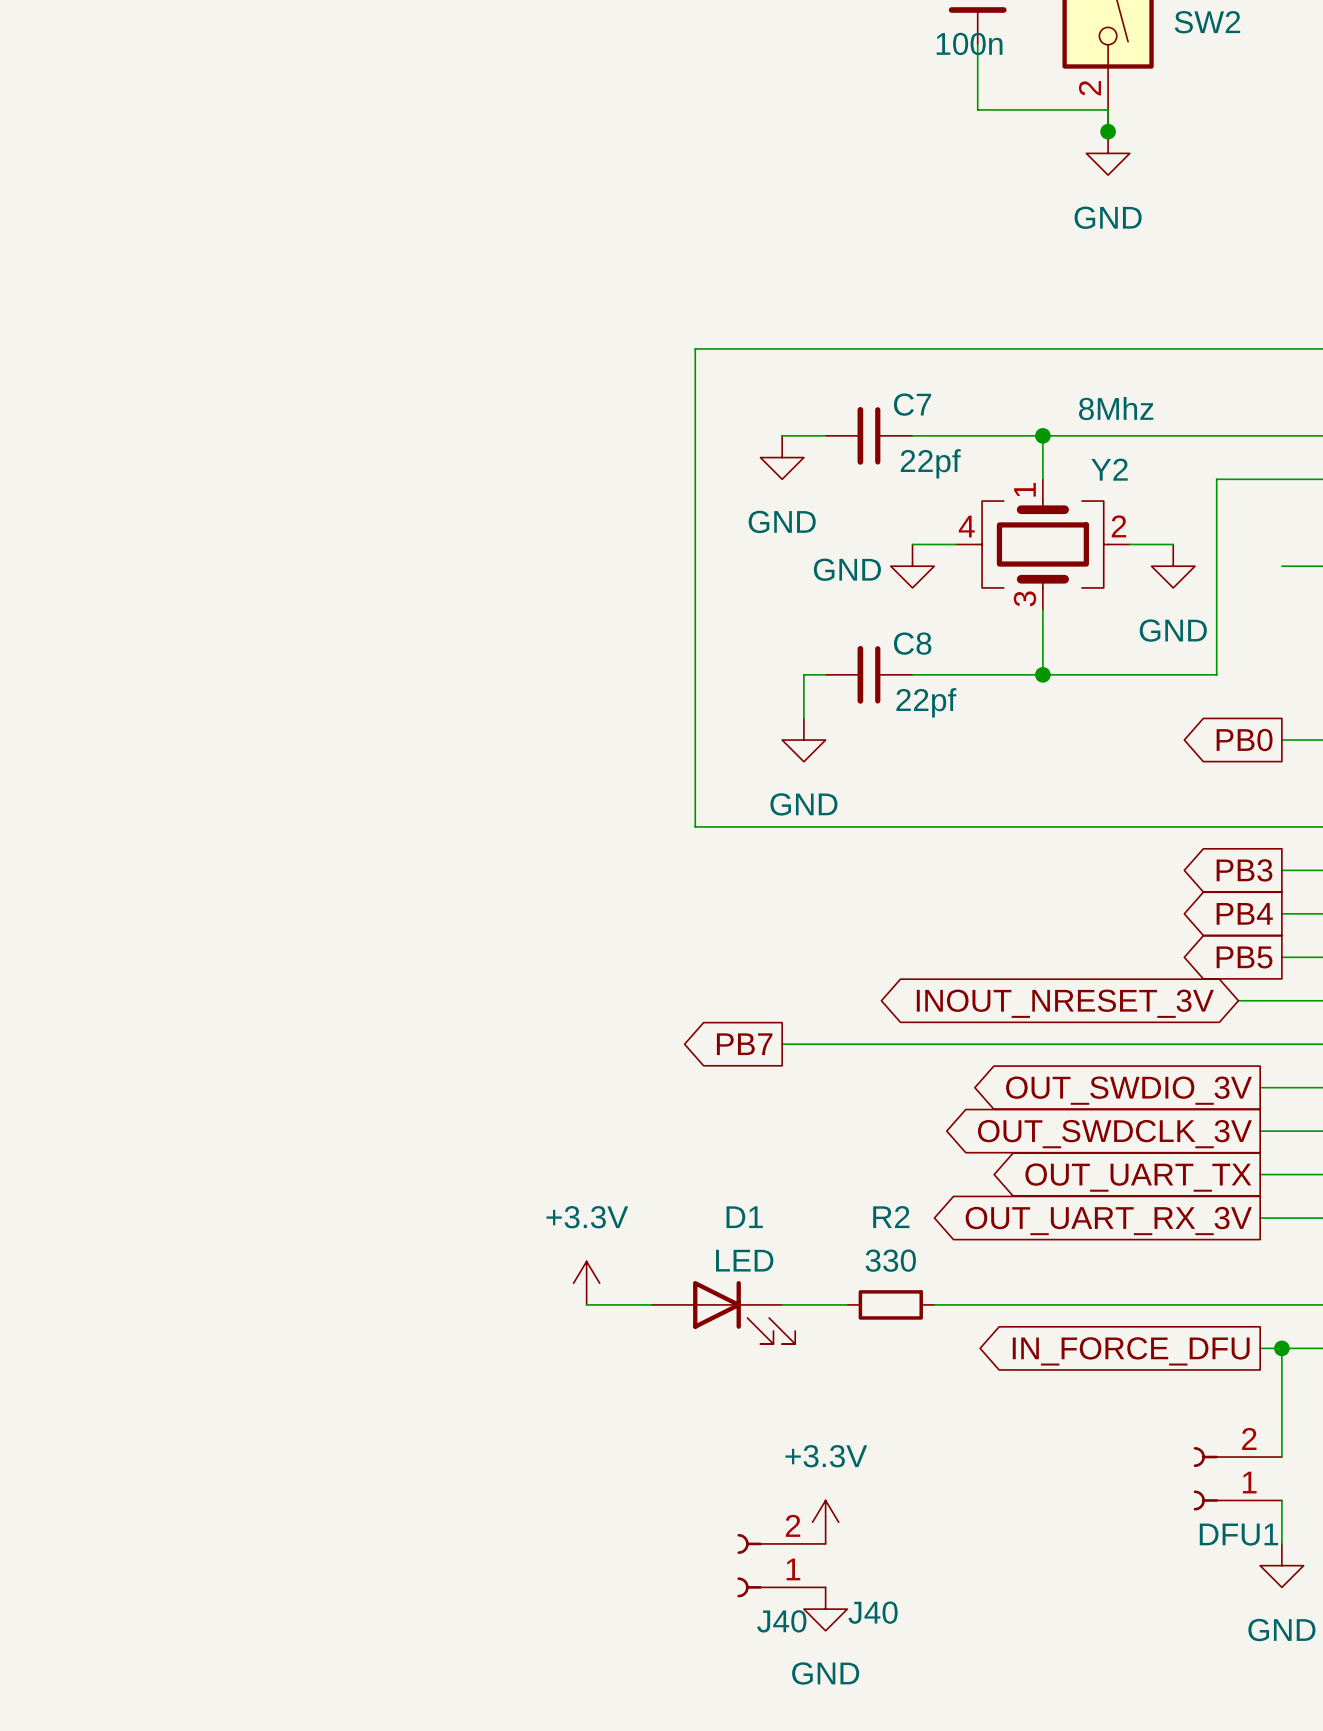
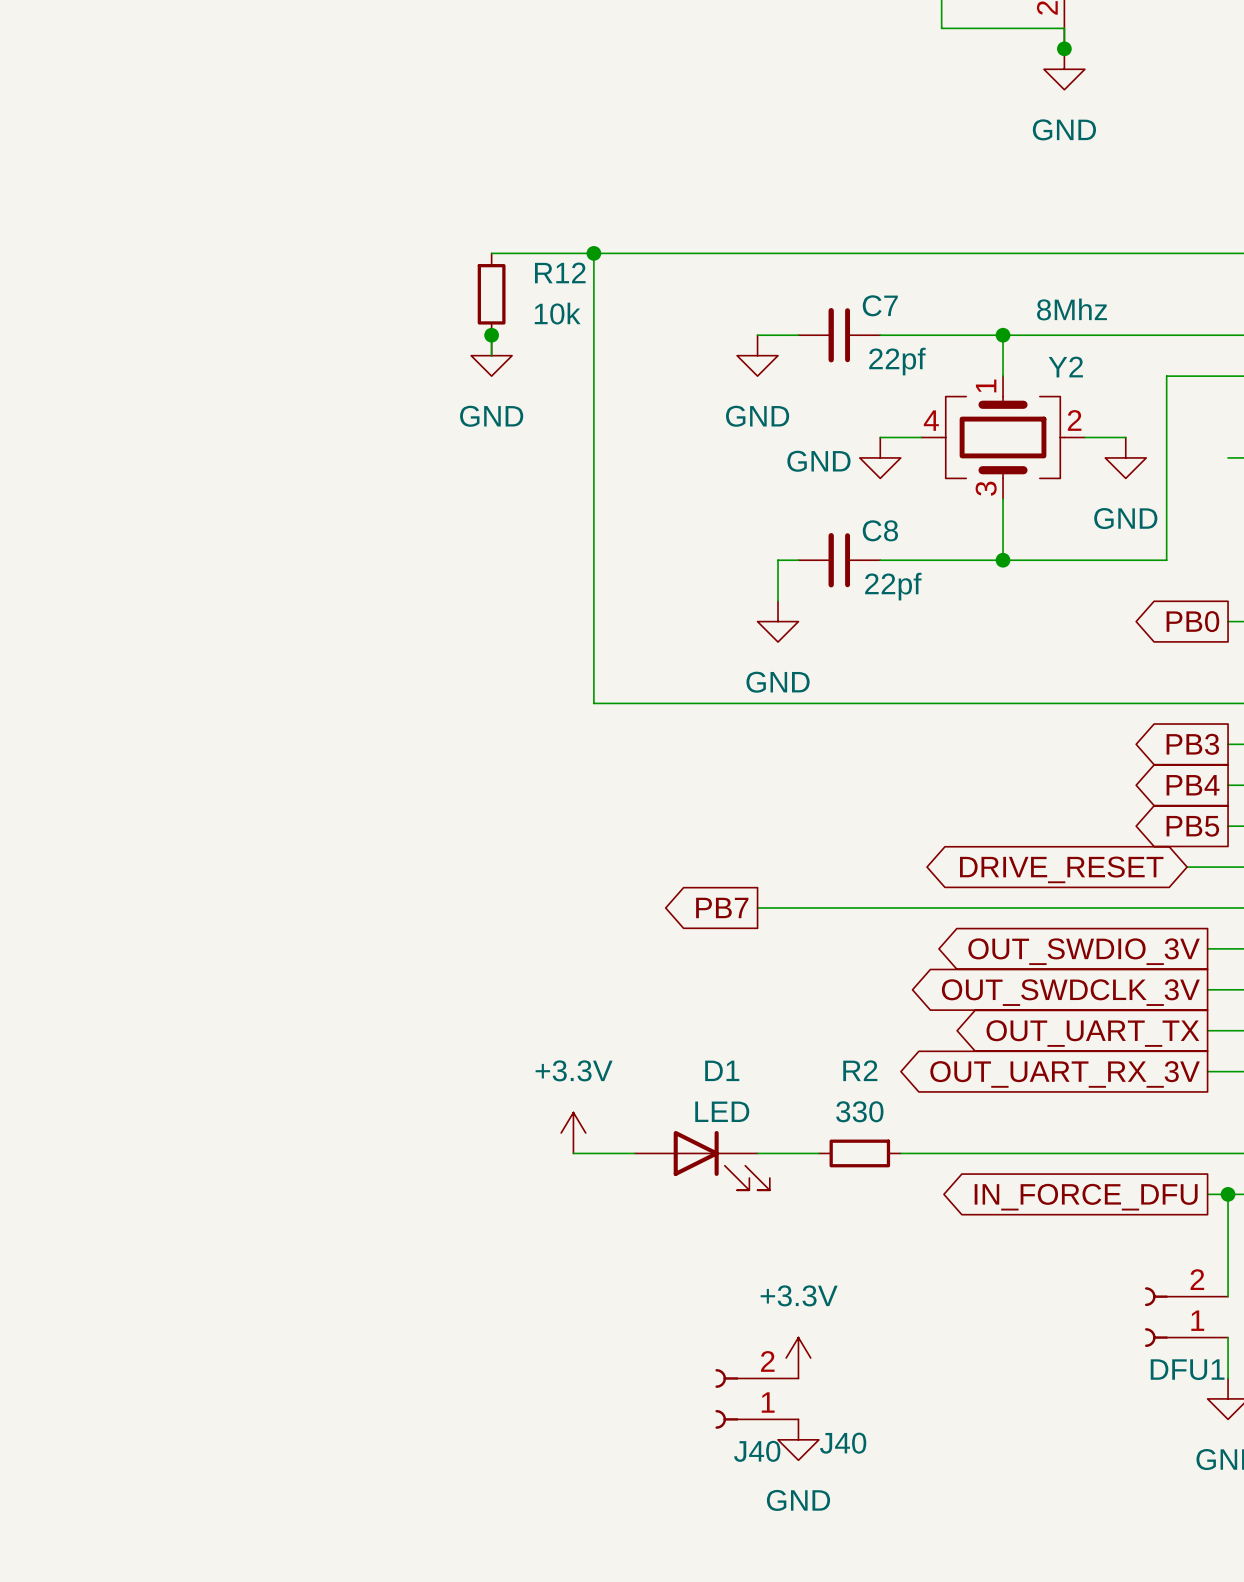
wire: none -> (491, 253) (675, 253)
junction: none -> (593, 253)
wire: (695, 348) (695, 826) -> (593, 253) (593, 703) (675, 703)
R12: none -> 10k (491, 294)
wire: none -> (491, 335) (491, 355)
junction: none -> (491, 335)
power symbol: none -> GND (491, 355)
global label: INOUT_NRESET_3V (1065, 1003) -> DRIVE_RESET (1061, 869)

